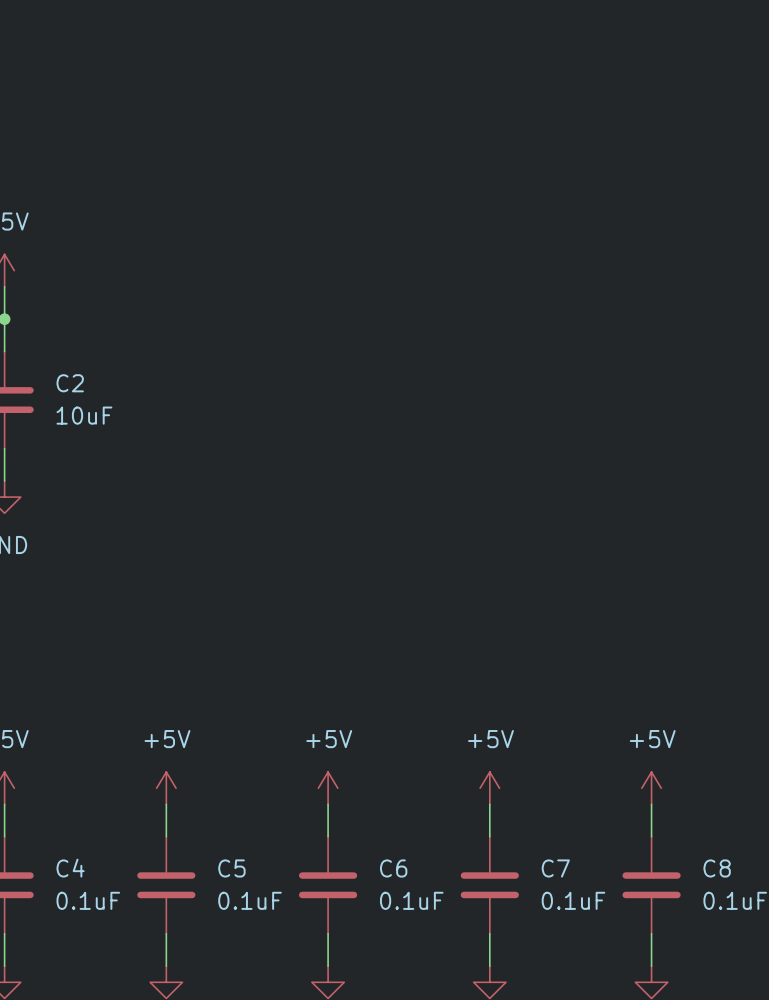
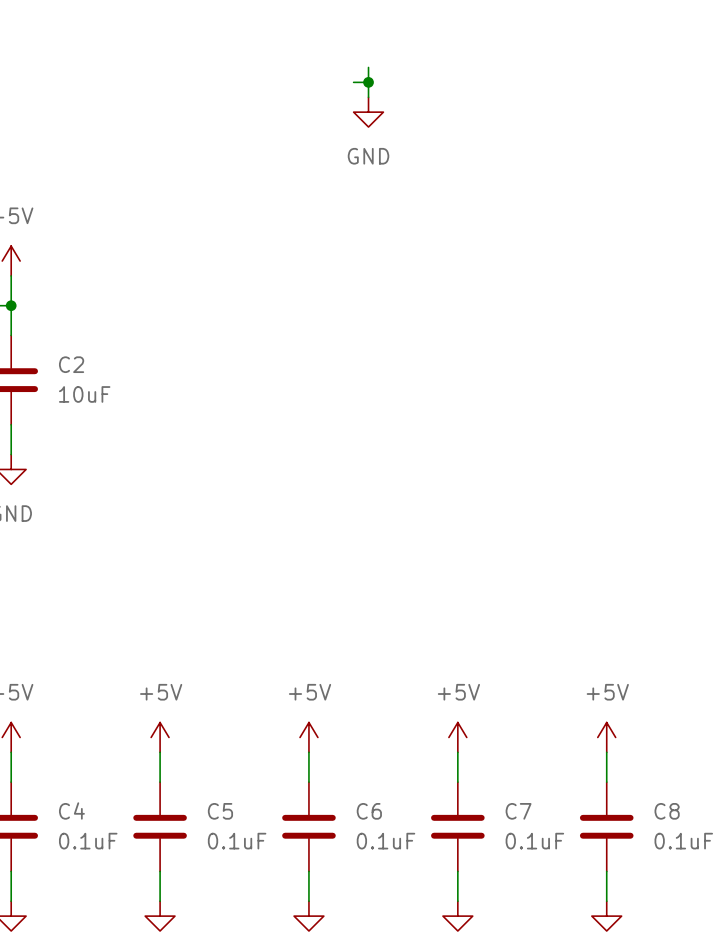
wire: none -> (368, 67) (368, 97)
wire: none -> (353, 82) (368, 82)
junction: none -> (368, 82)
power symbol: none -> GND (368, 112)

